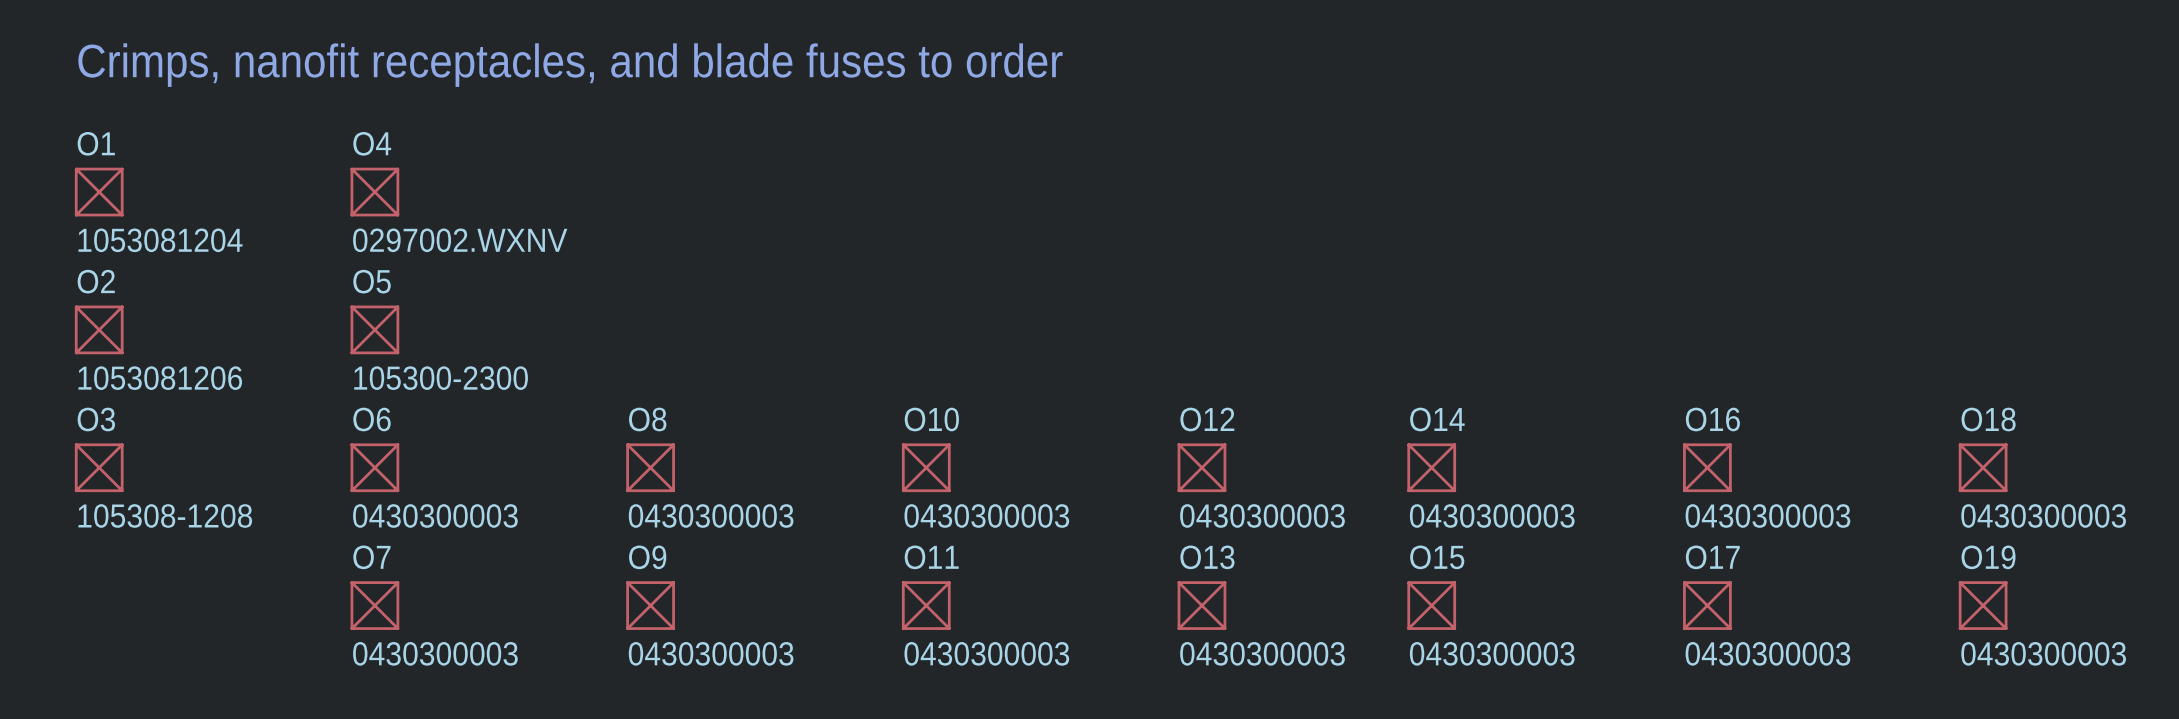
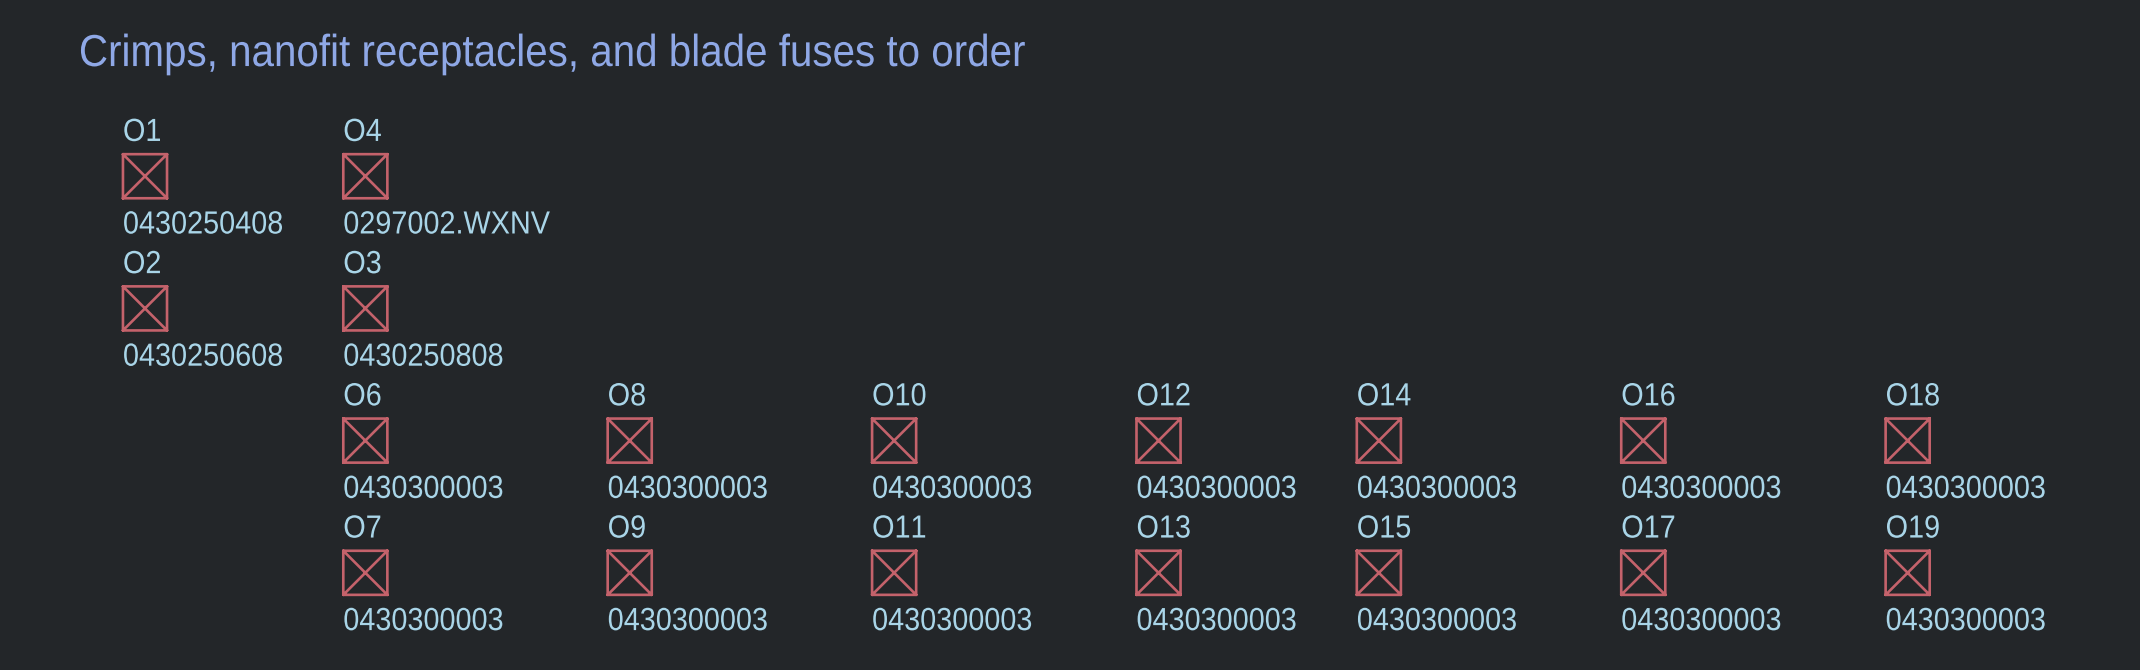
O1 position: (99, 192) -> (144, 176)
O1 text: 1053081204 (160, 240) -> 0430250408 (203, 222)
O5 name: O5 (372, 281) -> O3 (362, 262)
O2 position: (99, 329) -> (144, 308)
O2 text: 1053081206 (160, 378) -> 0430250608 (203, 354)
O5 text: 105300-2300 (441, 378) -> 0430250808 (423, 354)
O3: (99, 467) -> none

